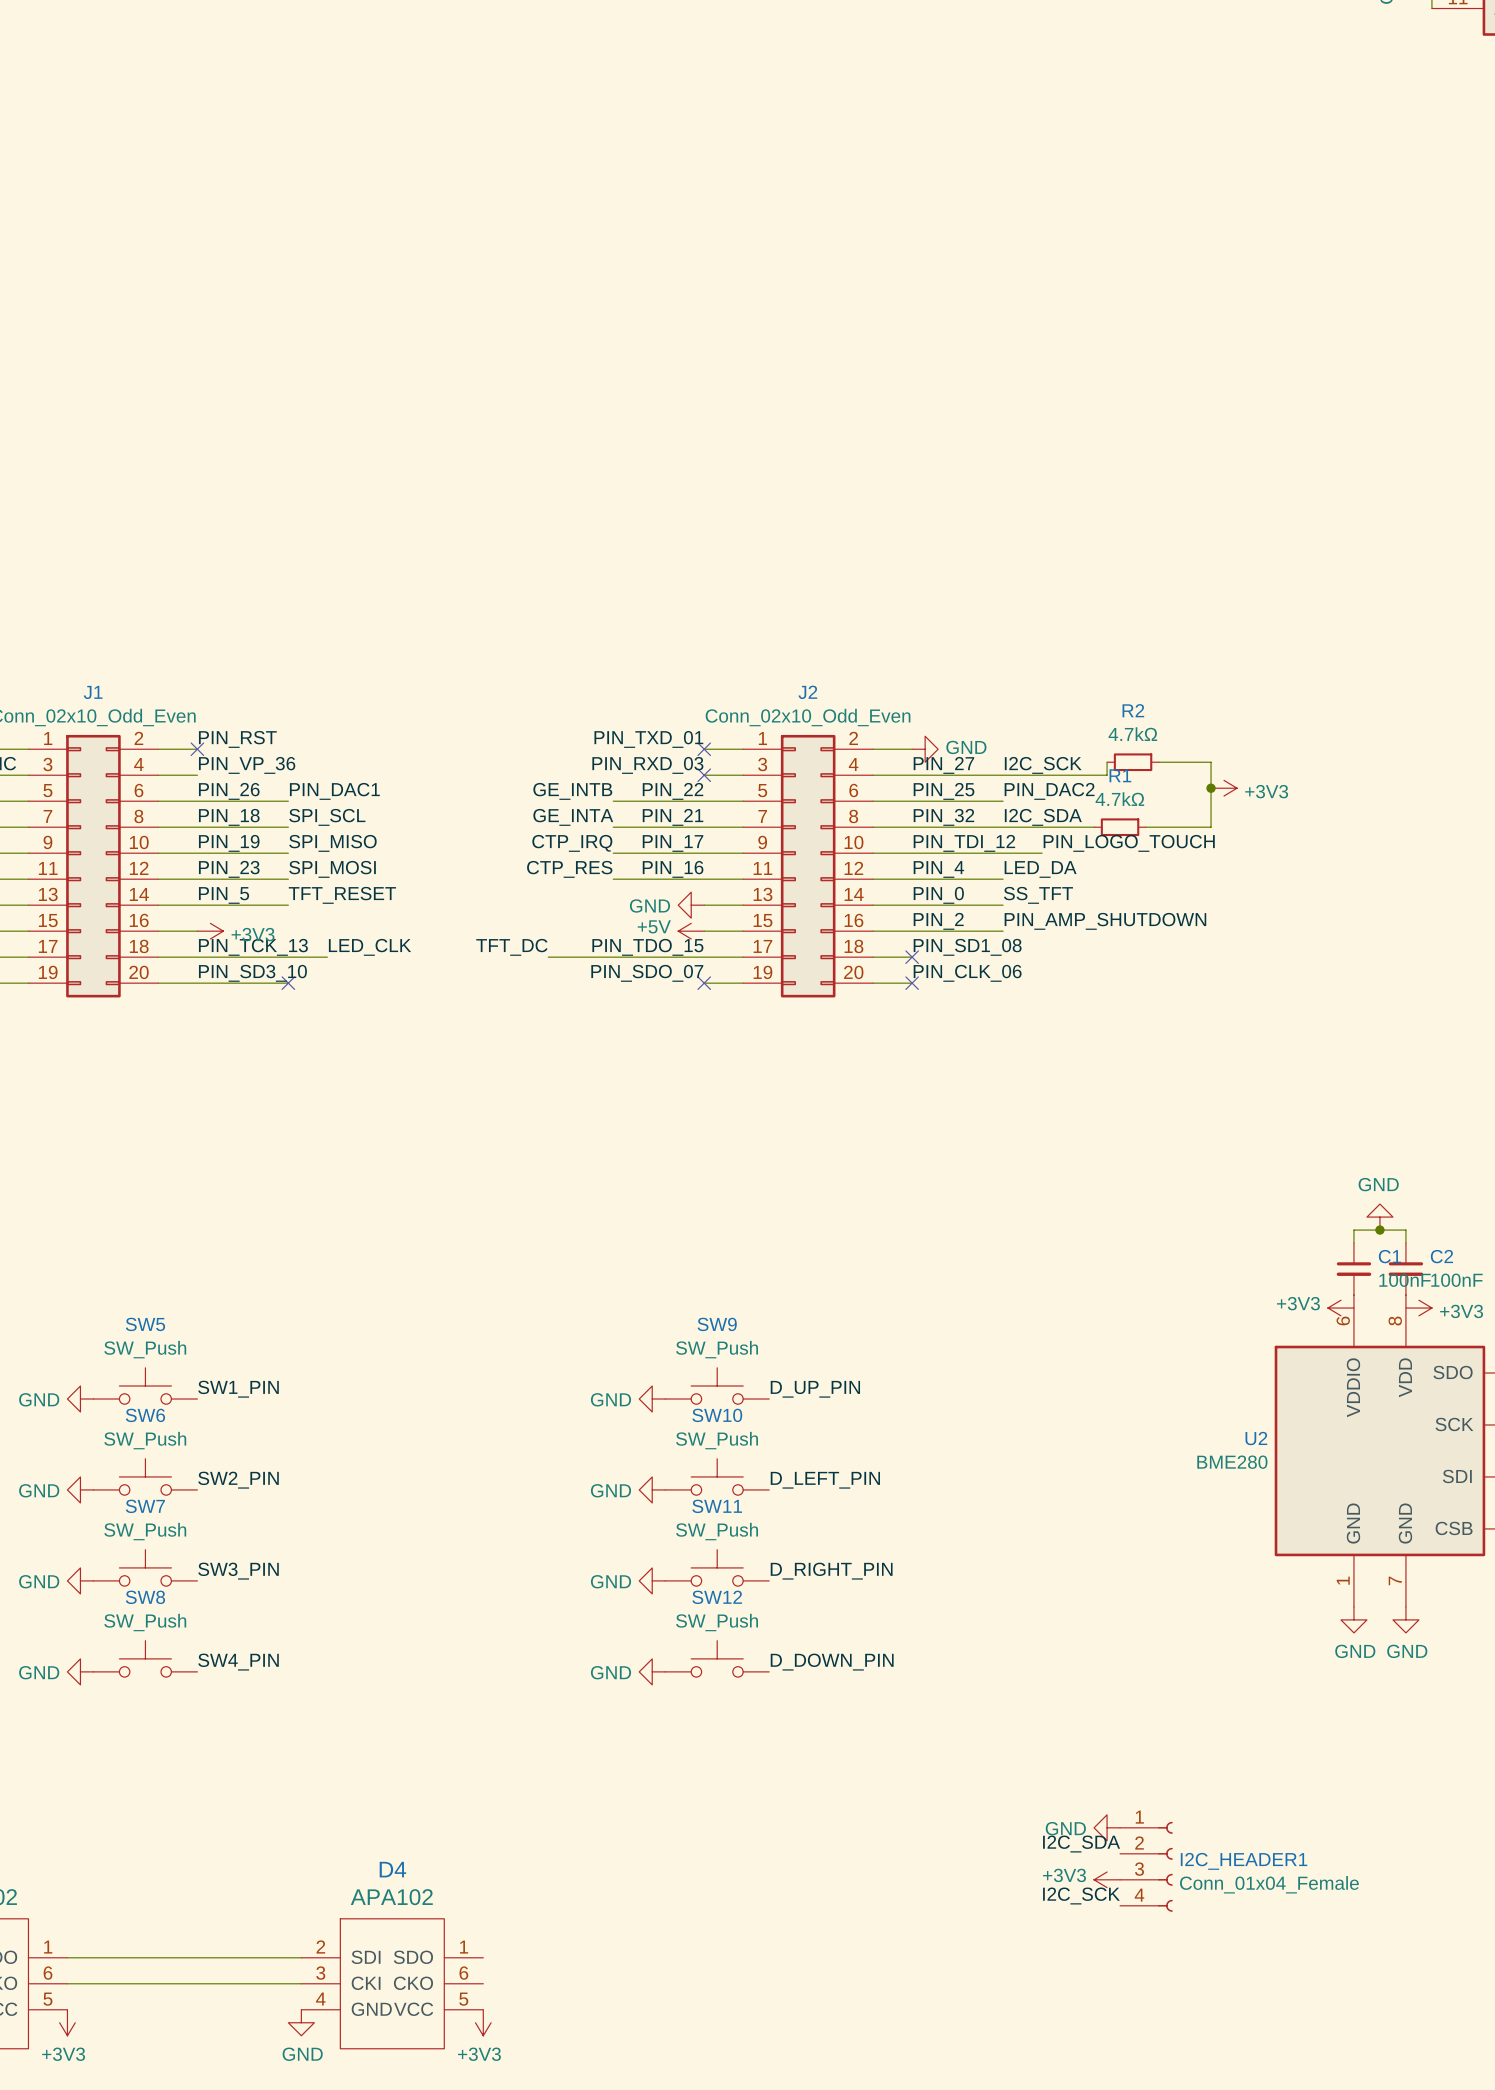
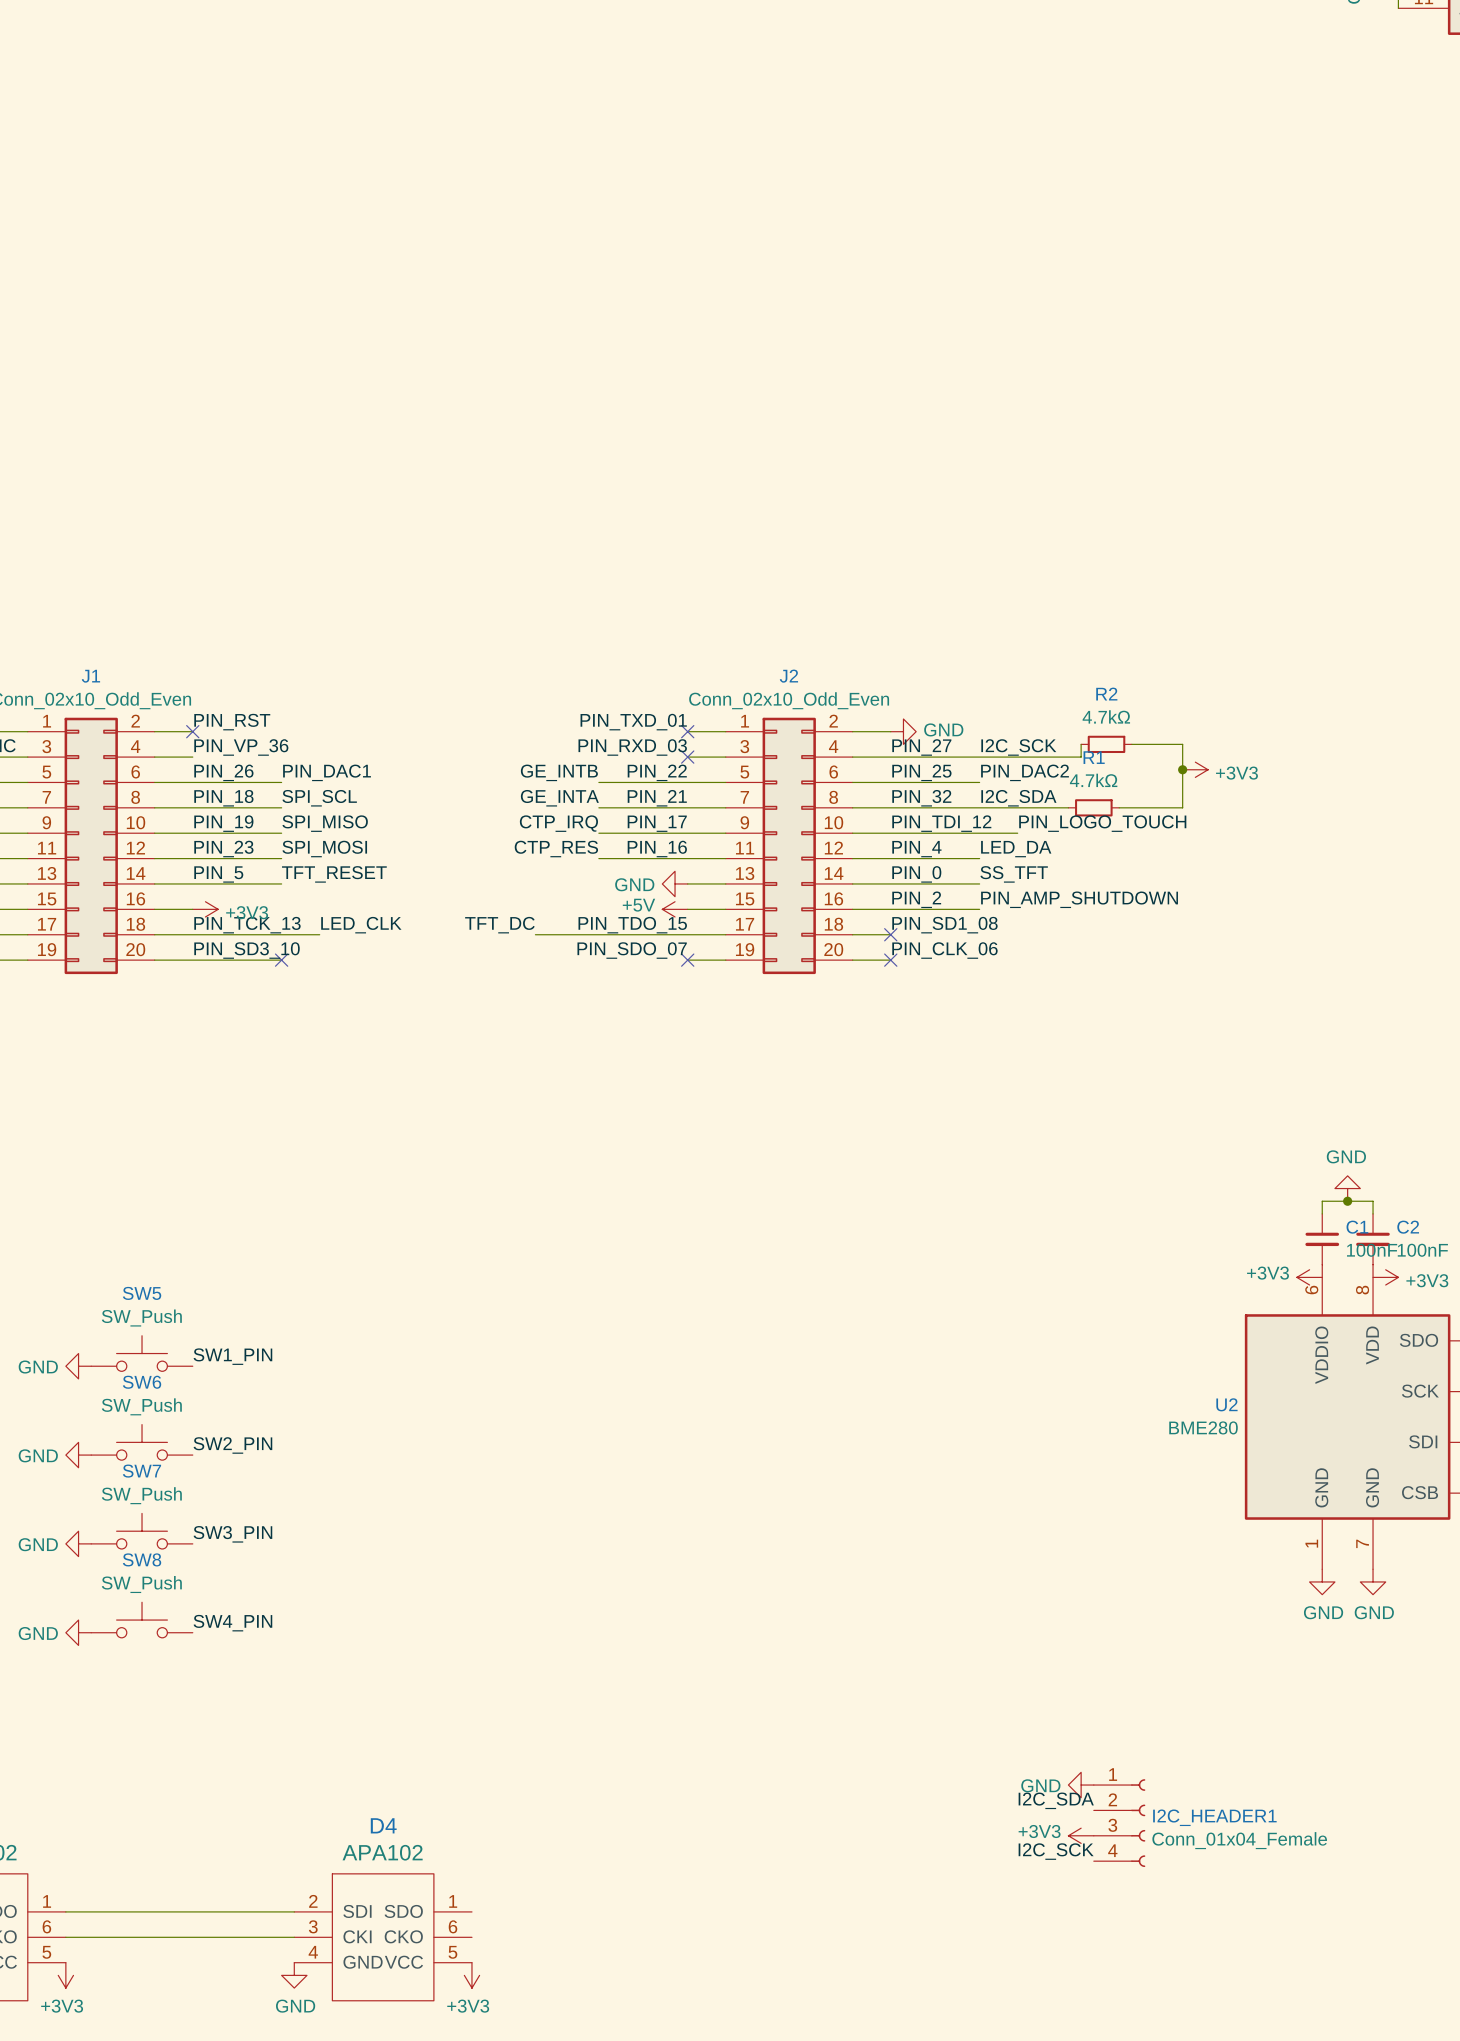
SW9: SW_Push (717, 1386) -> none
label: D_UP_PIN (815, 1389) -> none
power symbol: GND (652, 1399) -> none
SW10: SW_Push (717, 1476) -> none
label: D_LEFT_PIN (825, 1480) -> none
power symbol: GND (652, 1489) -> none
SW11: SW_Push (717, 1567) -> none
label: D_RIGHT_PIN (831, 1571) -> none
power symbol: GND (652, 1580) -> none
SW12: SW_Push (717, 1658) -> none
label: D_DOWN_PIN (832, 1662) -> none
power symbol: GND (652, 1671) -> none

